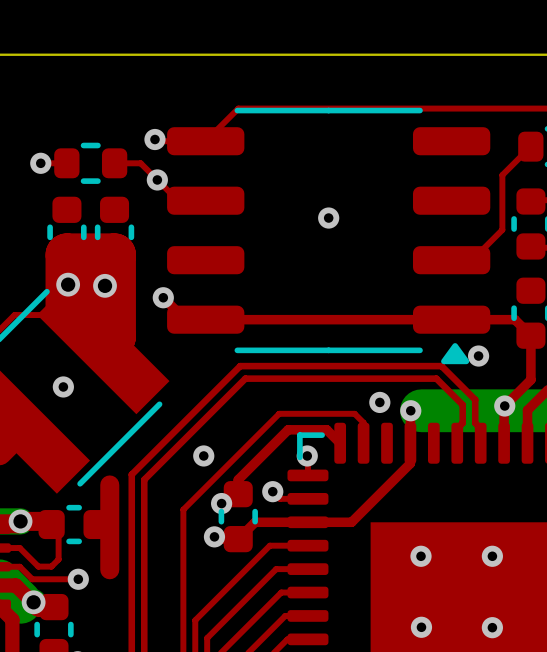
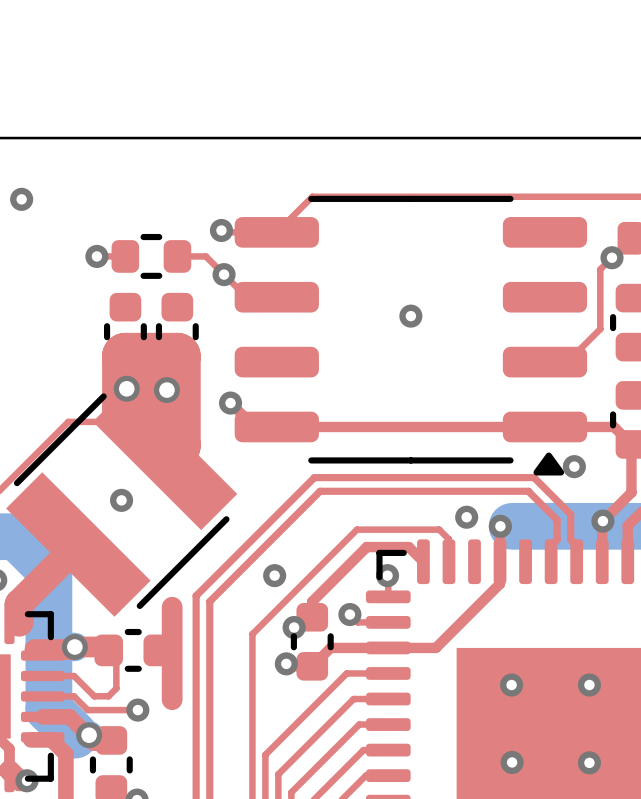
via: none -> (612, 257)

